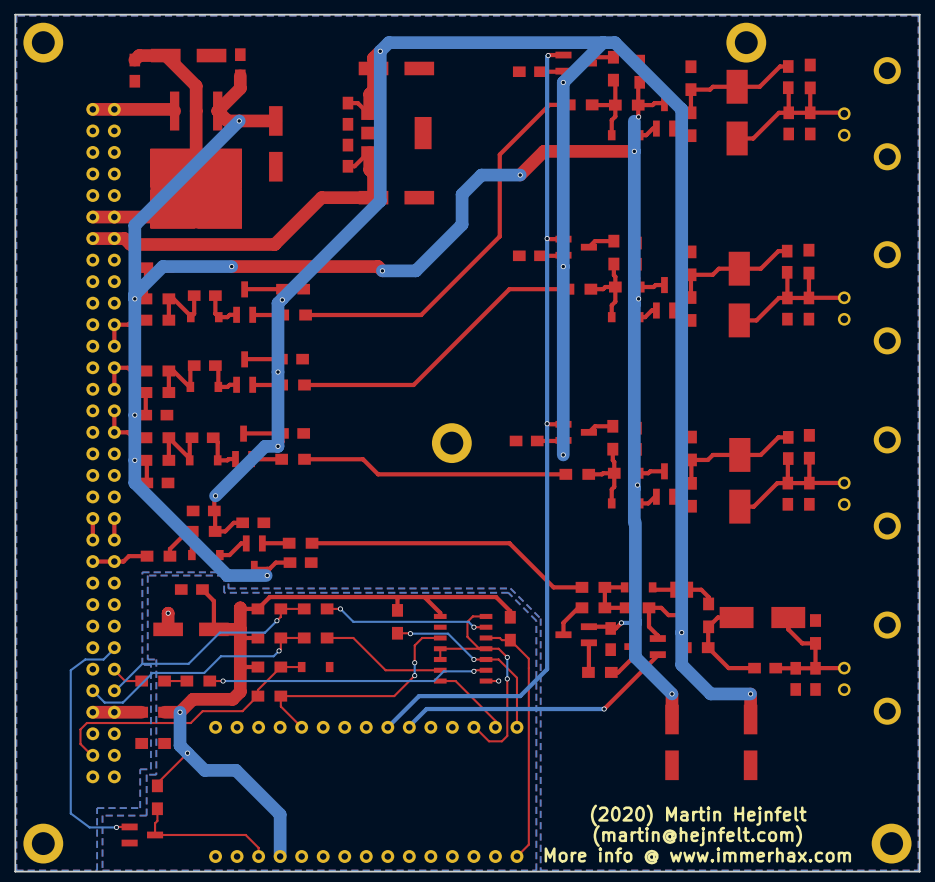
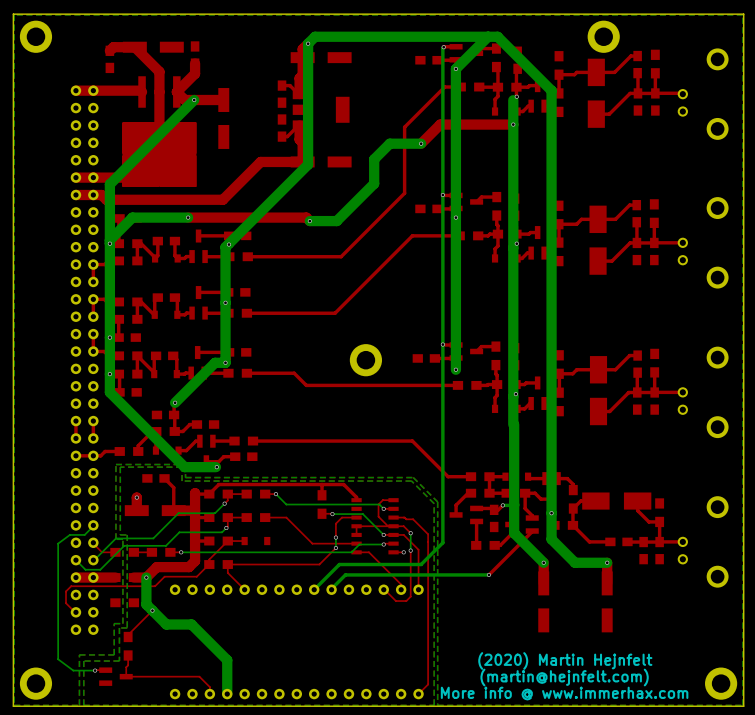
top track: (424, 597) (496, 597) (510, 611) (510, 617) -> none
part: (510, 628) -> none

